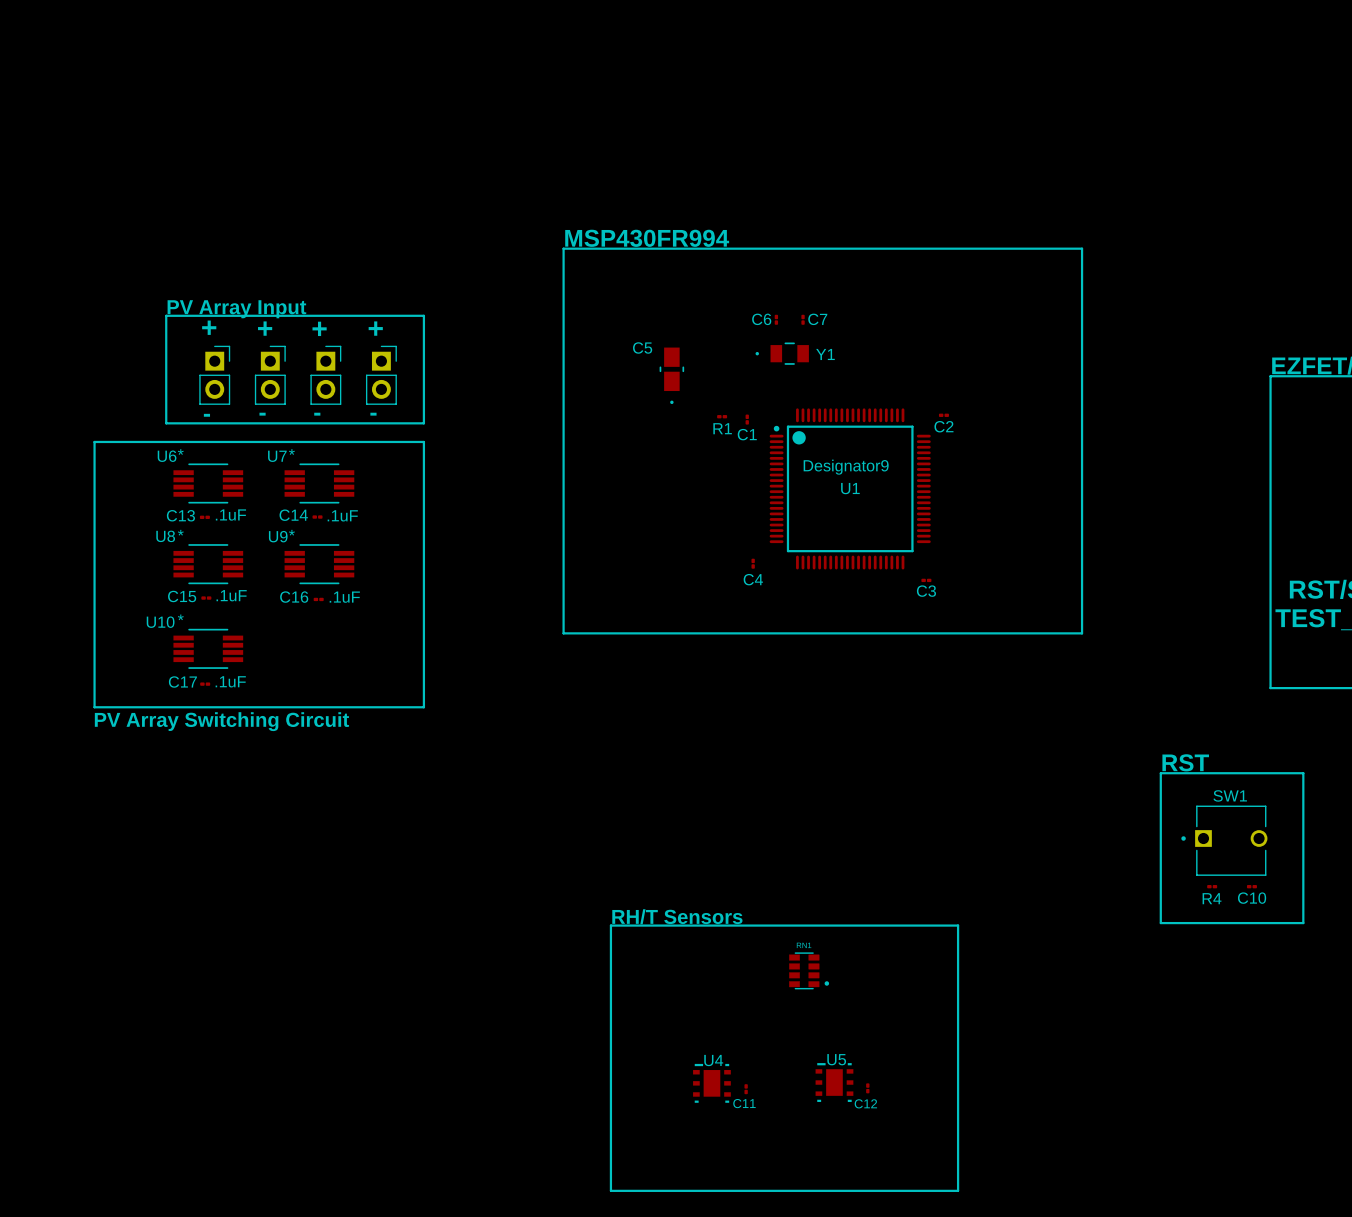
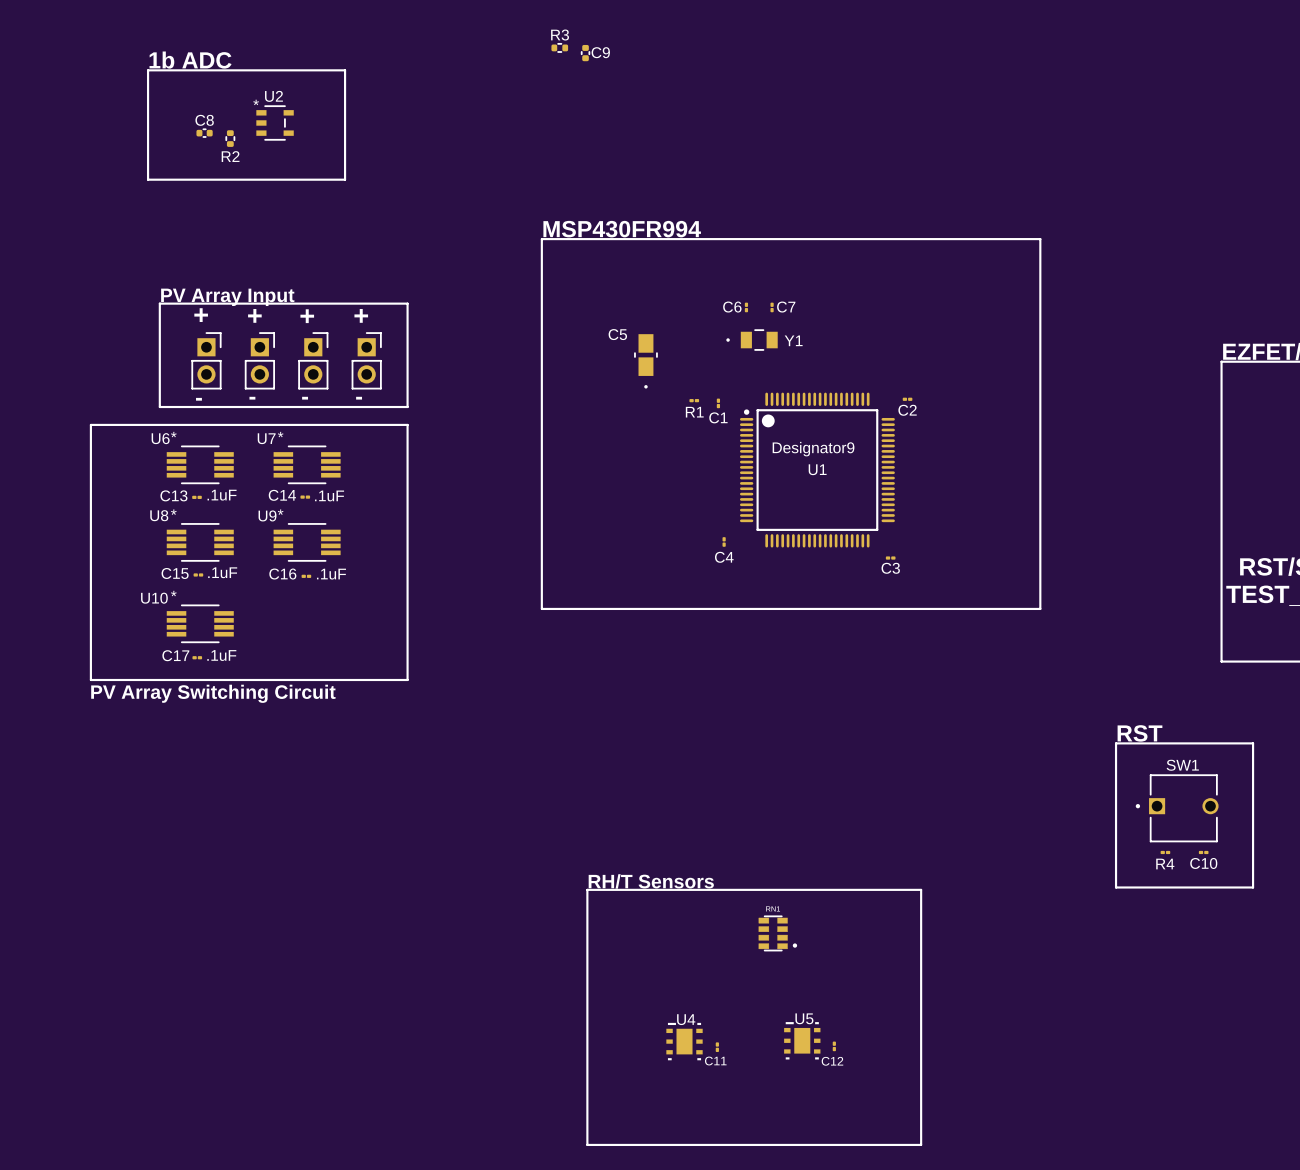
R3: none -> (559, 47)
C9: none -> (585, 53)
text: none -> 1b ADC (190, 60)
line: none -> (148, 70) (345, 70) (345, 179) (148, 179) (148, 70)
U2: none -> (275, 122)
C8: none -> (204, 133)
R2: none -> (230, 138)

